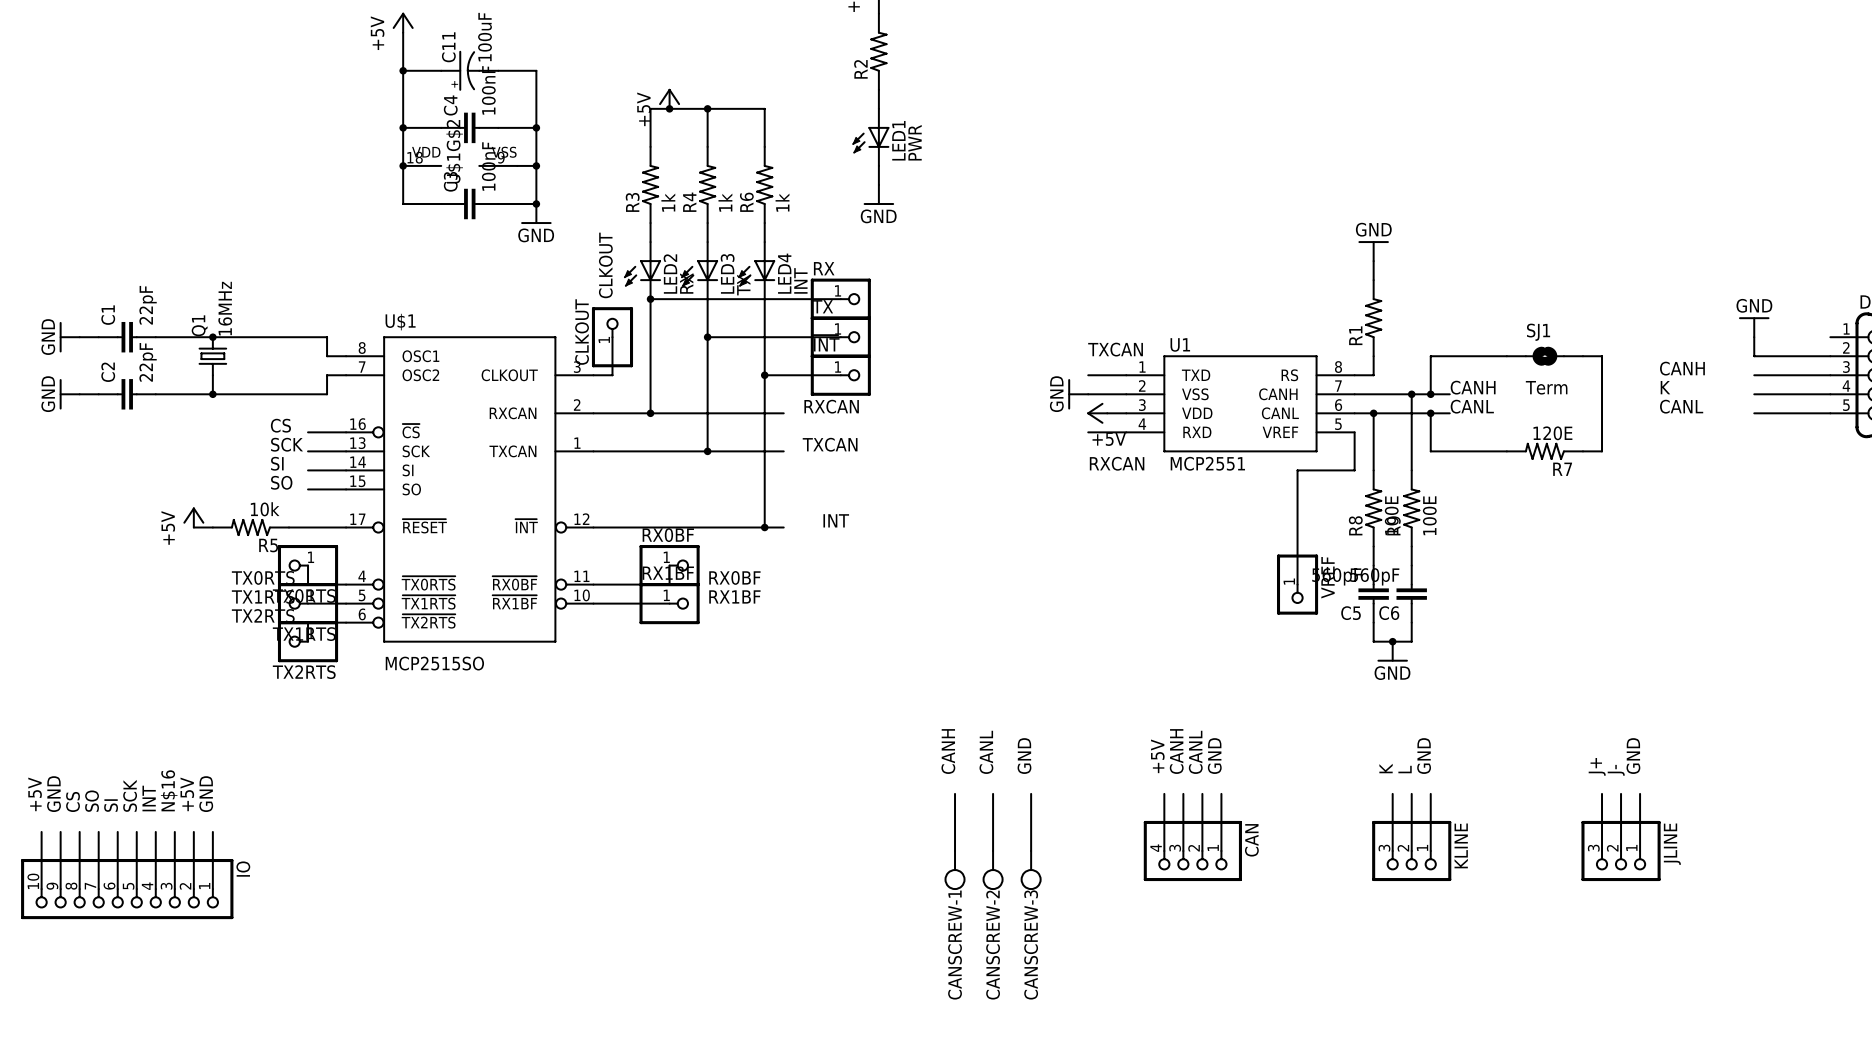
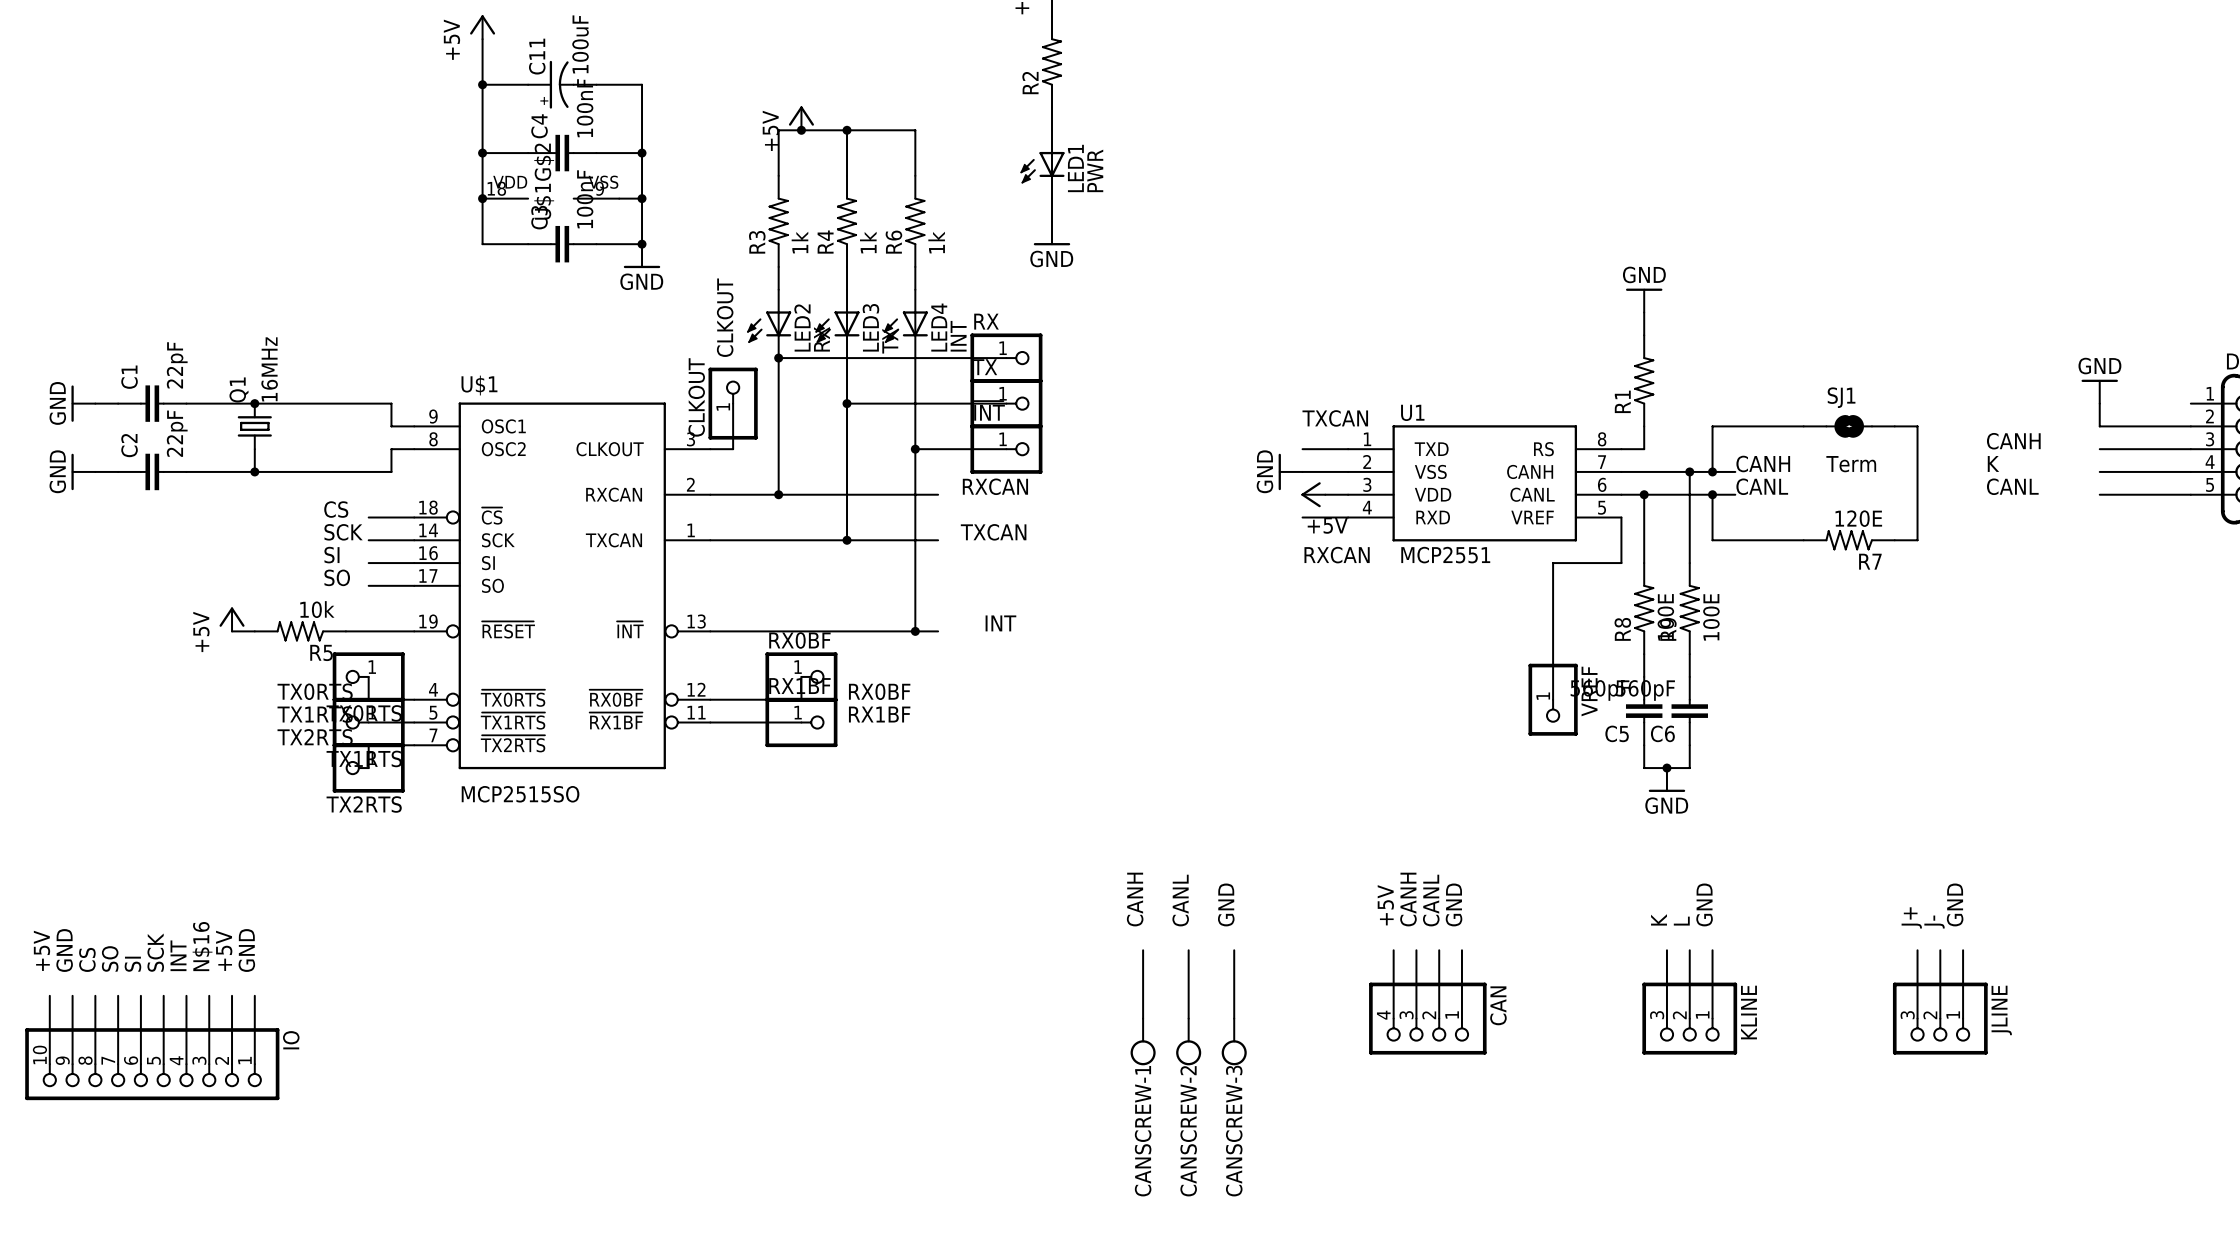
U$1 symbol: [346, 336, 594, 643] -> [414, 402, 711, 770]

